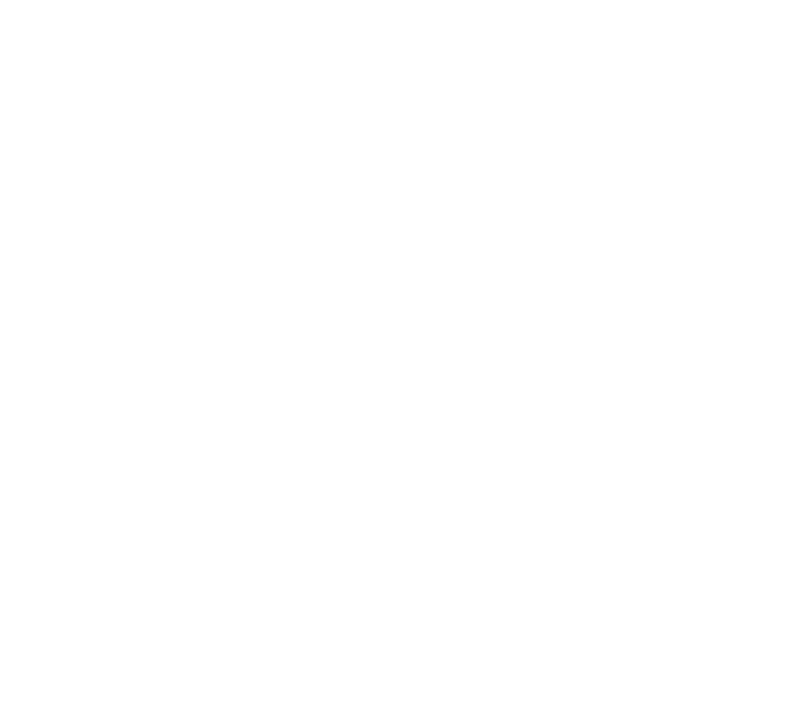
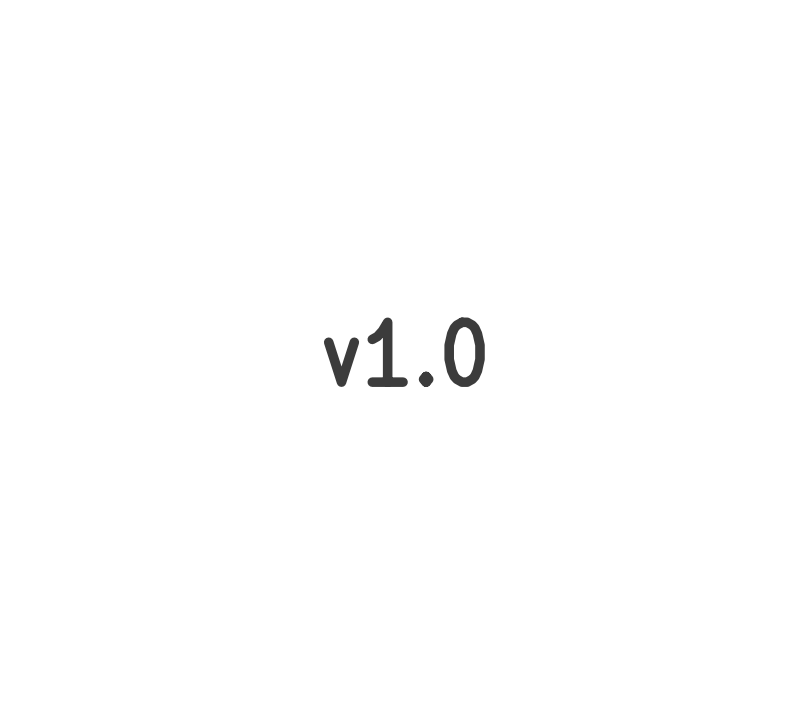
text: none -> v1.0 (404, 352)

